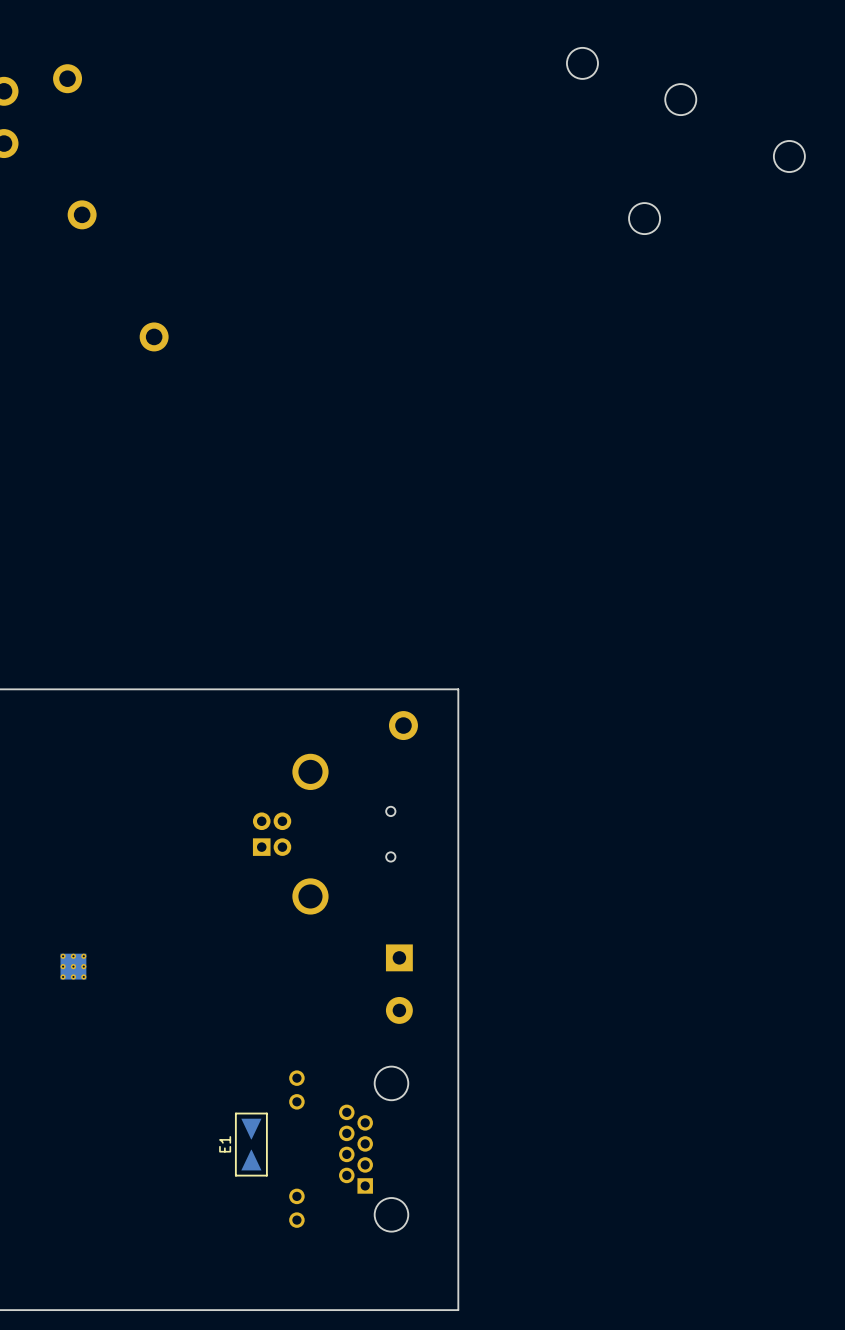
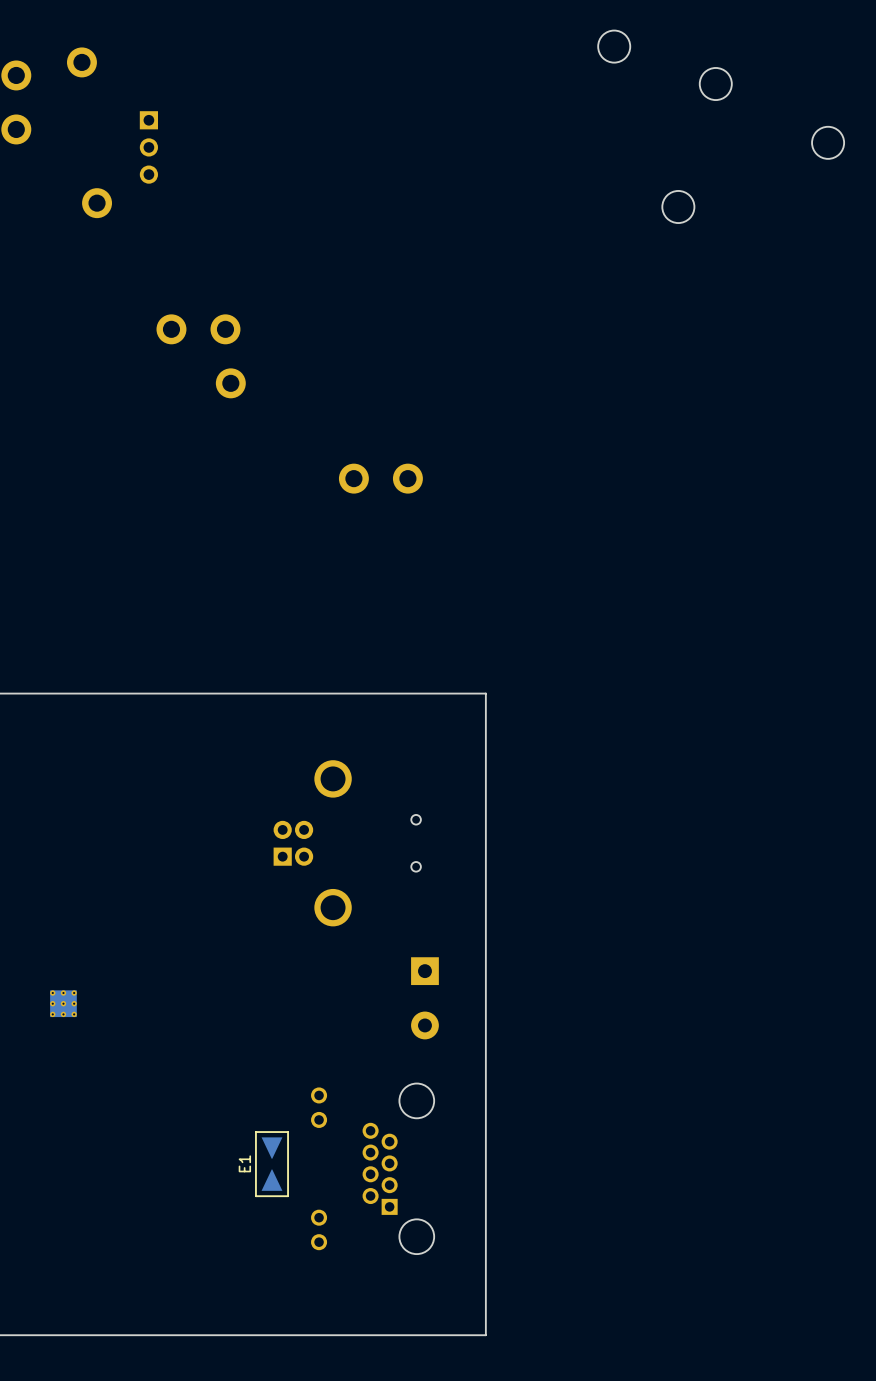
part: none -> (148, 147)
part: none -> (225, 329)
part: none -> (230, 383)
part: none -> (353, 478)
part: none -> (407, 478)
part: (403, 725) -> none
part position: (73, 966) -> (63, 1003)

